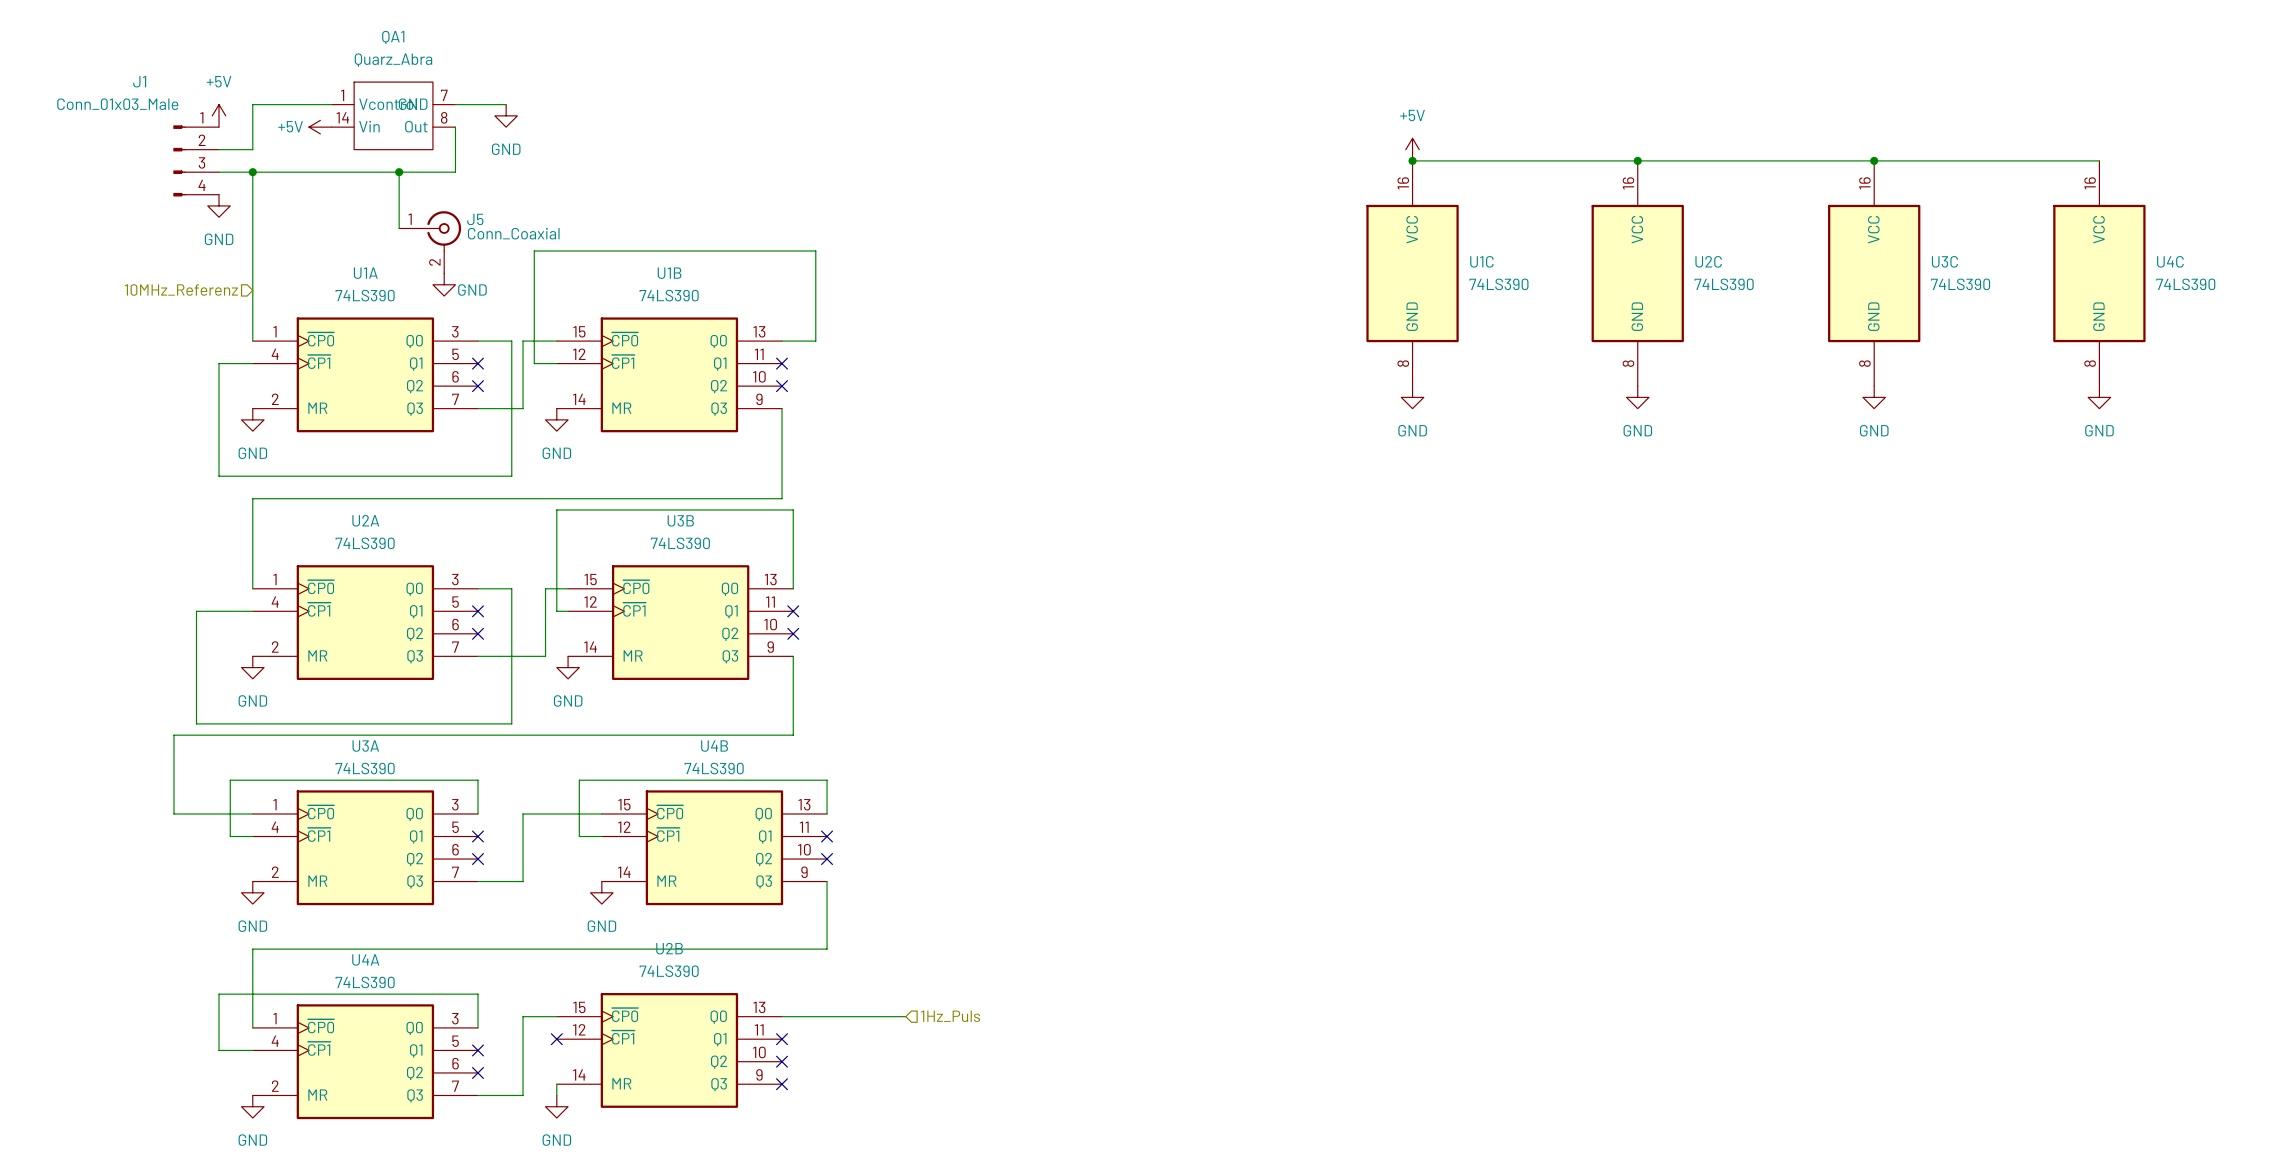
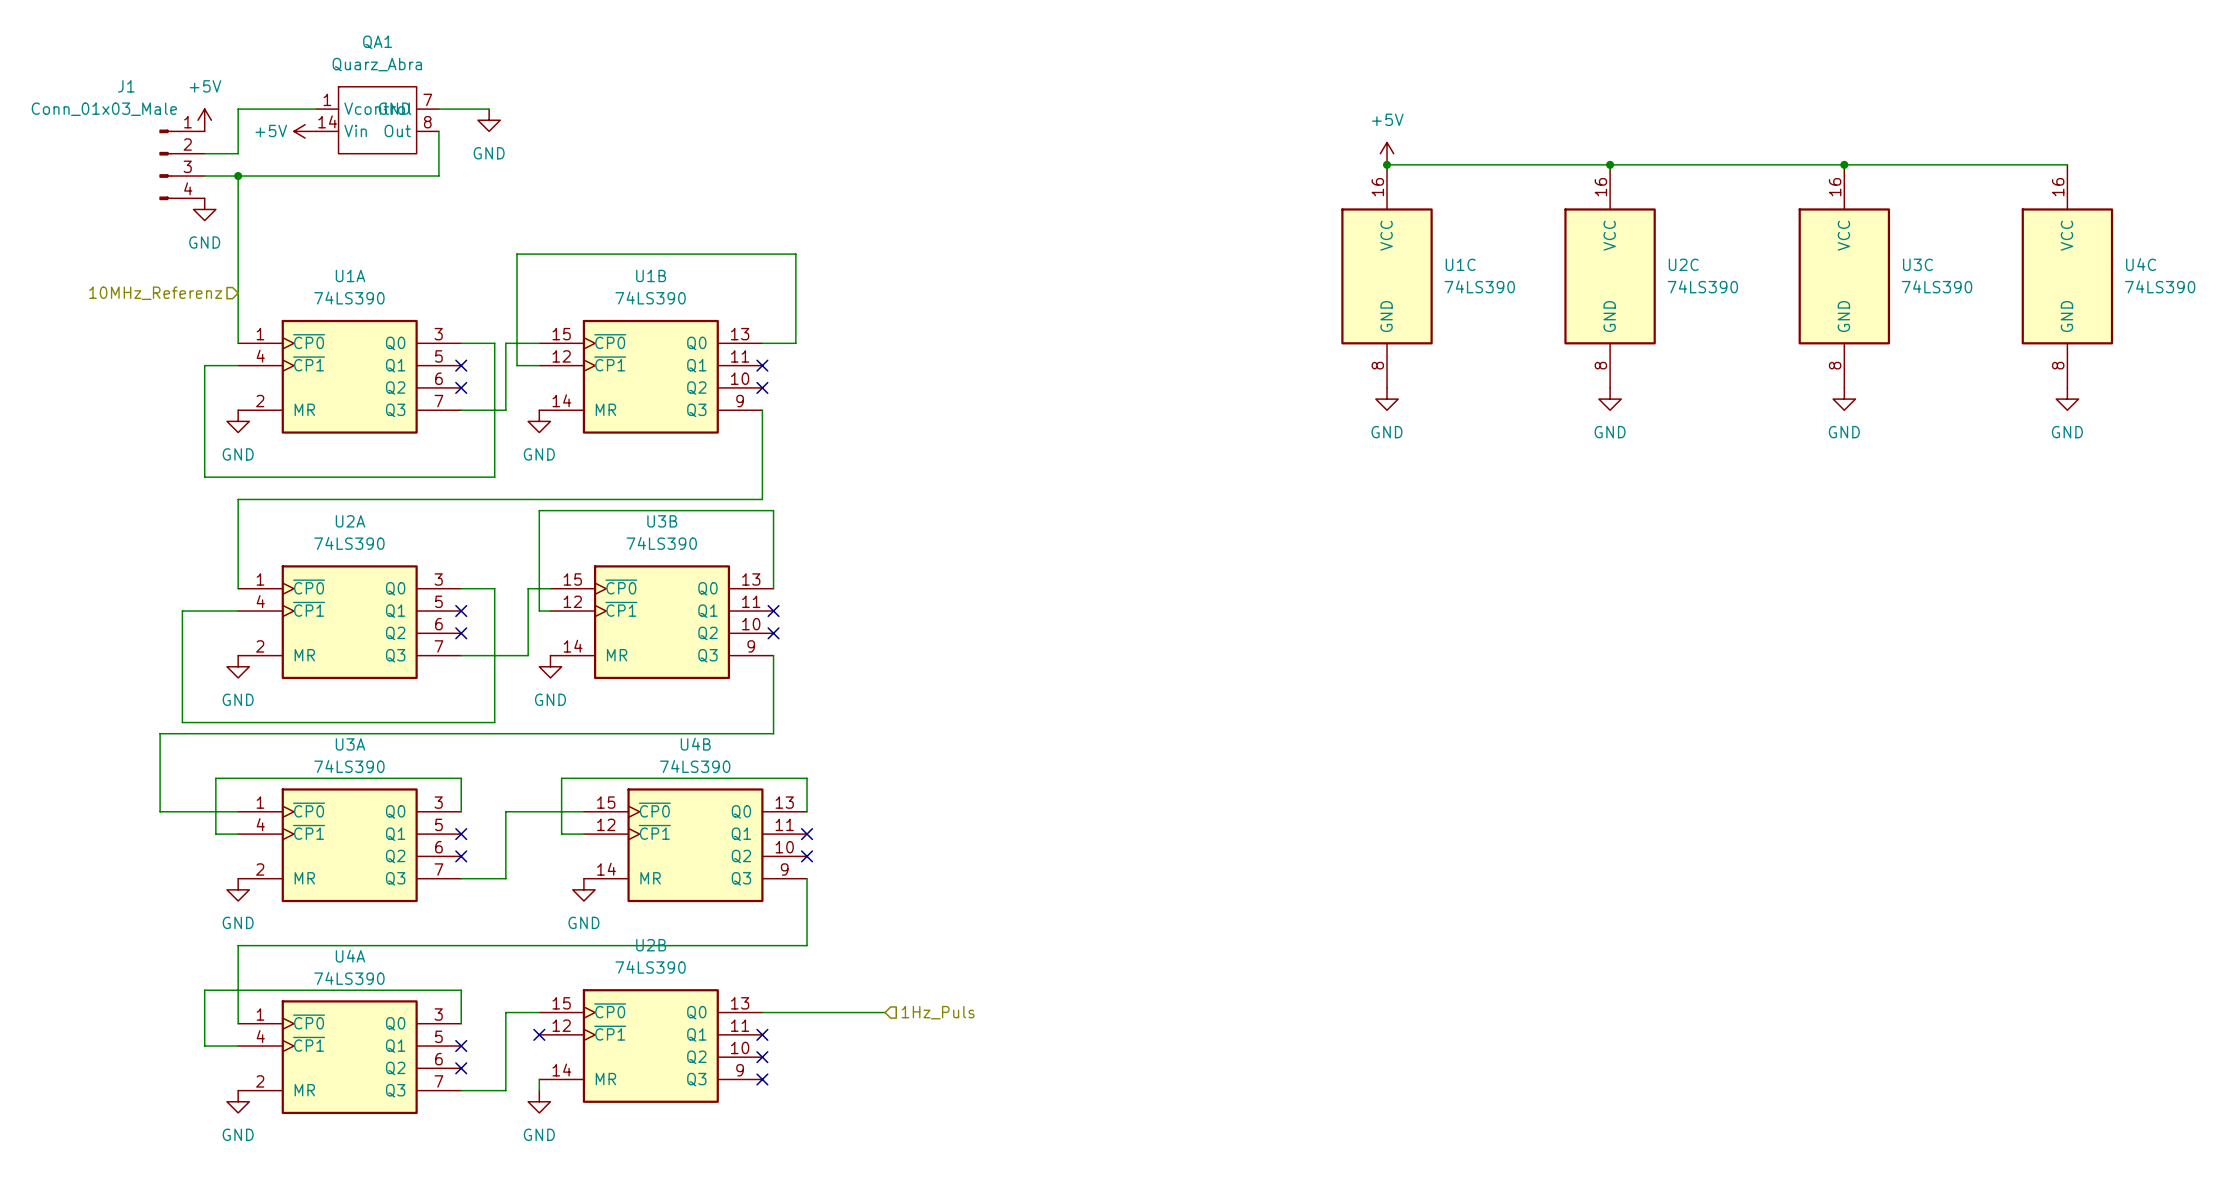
wire: (399, 172) (399, 228) -> none
junction: (399, 172) -> none
J5: Conn_Coaxial (430, 242) -> none
power symbol: GND (444, 284) -> none

